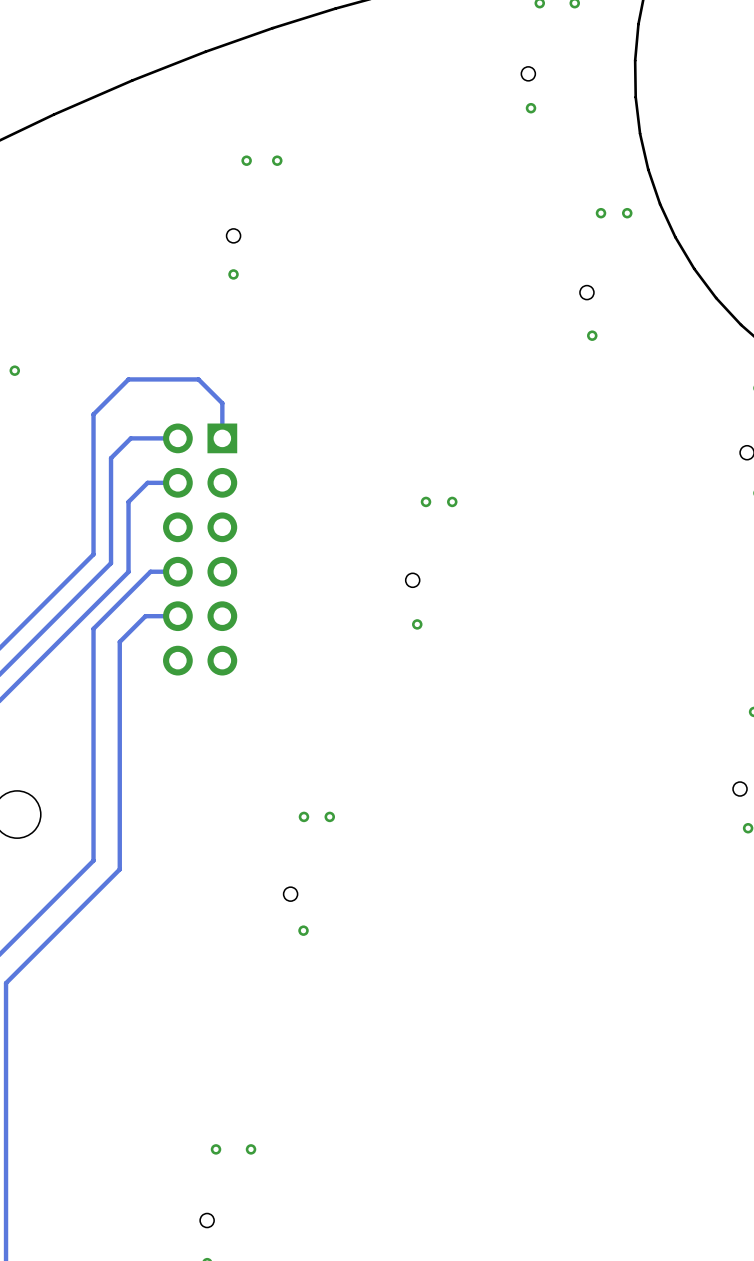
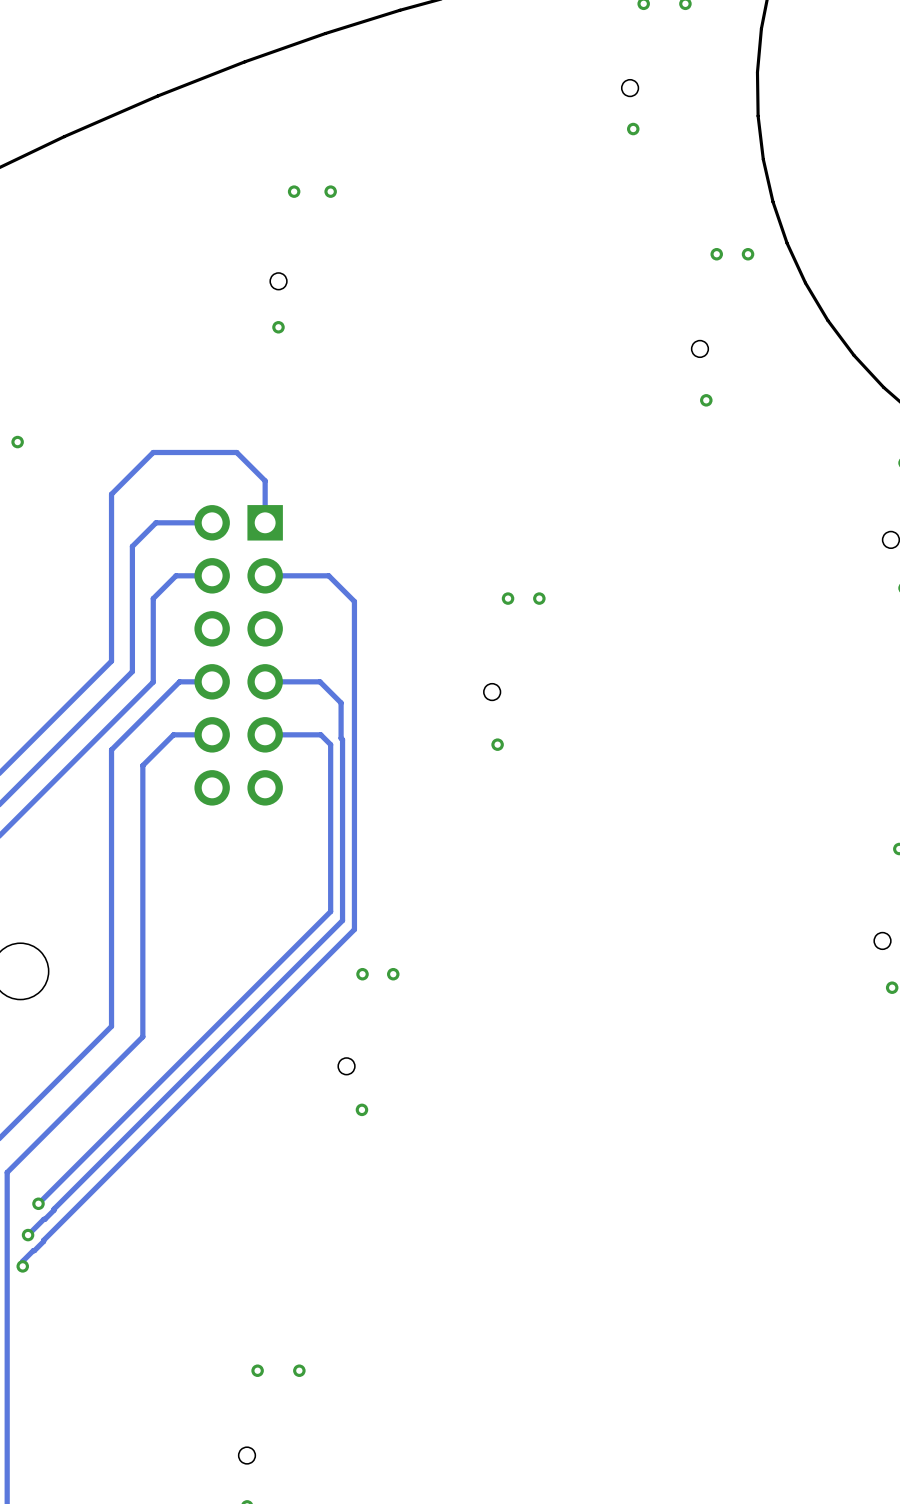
track: none -> (265, 575) (328, 575) (354, 601) (354, 929) (22, 1261) (22, 1266)
track: none -> (265, 681) (319, 681) (341, 702) (342, 920) (28, 1235)
track: none -> (265, 734) (320, 734) (330, 744) (330, 911) (38, 1203)
via: none -> (38, 1203)
via: none -> (28, 1235)
via: none -> (22, 1266)

